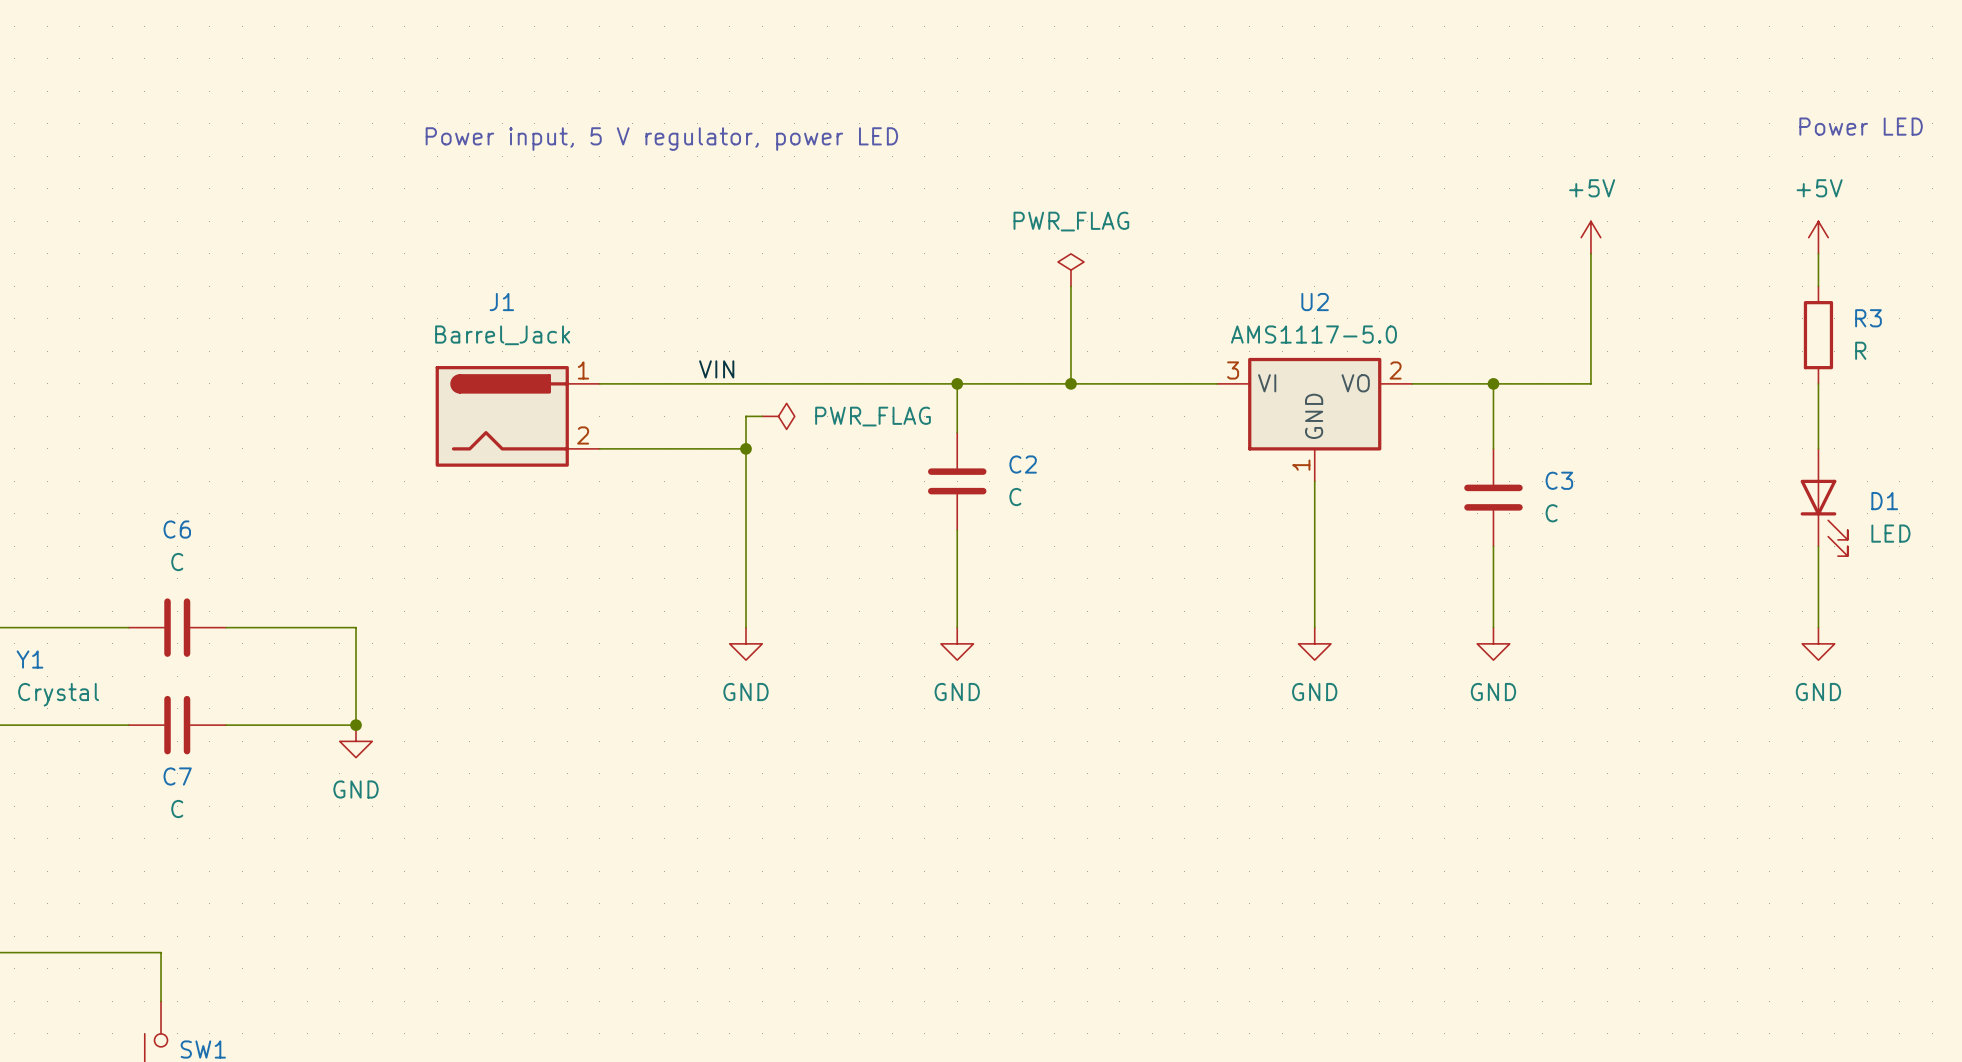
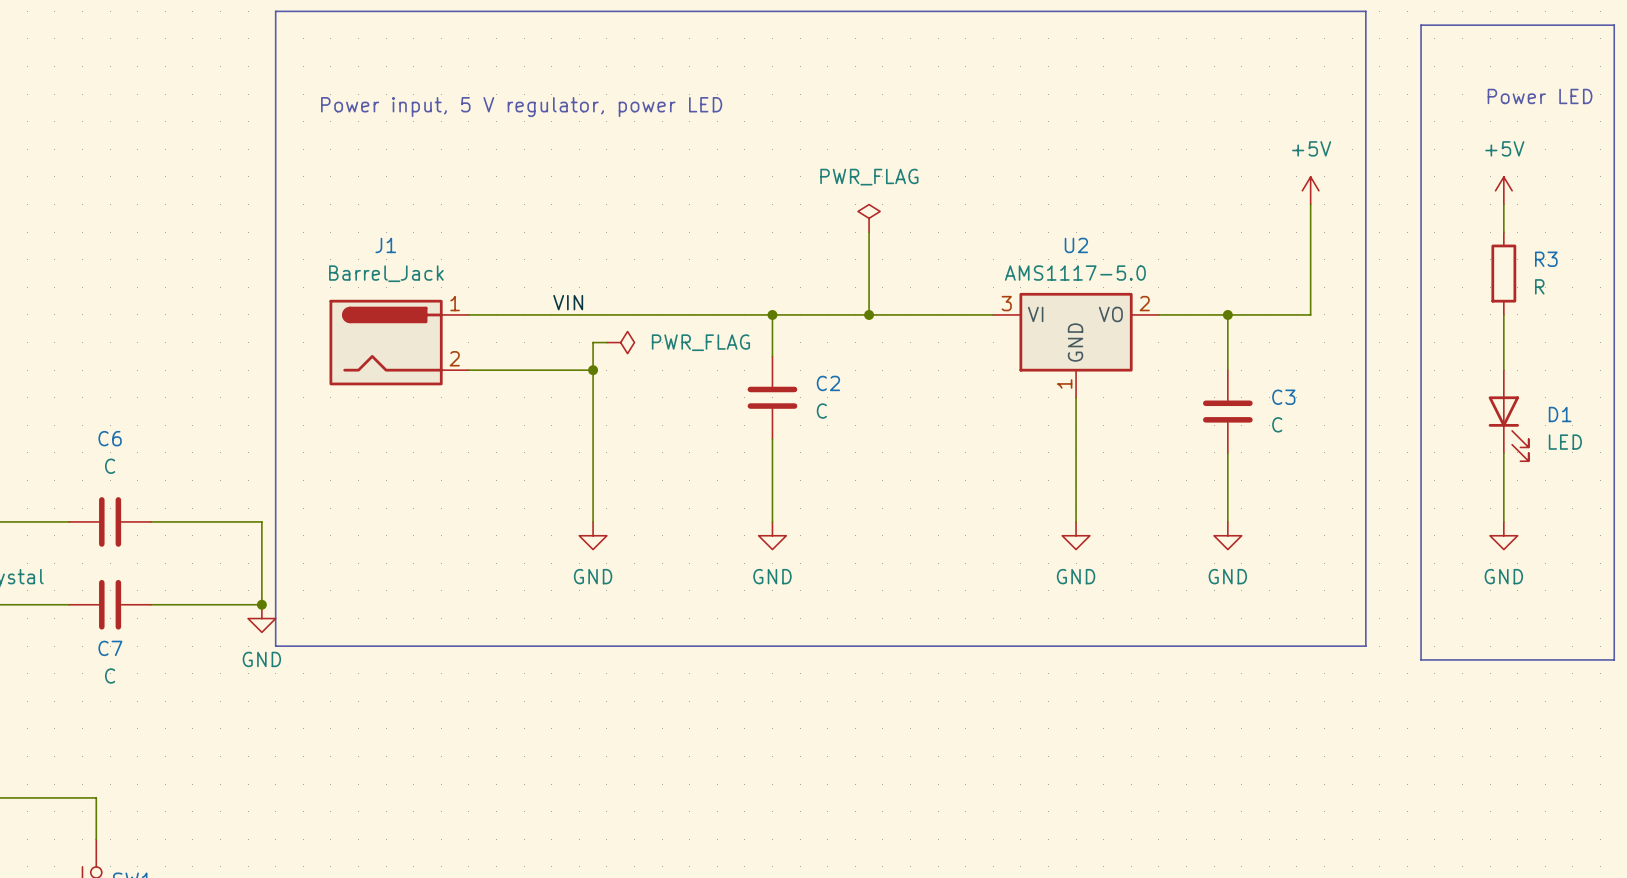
line: none -> (275, 11) (1365, 11) (1365, 646) (275, 646) (275, 11)
line: none -> (1421, 25) (1614, 25) (1614, 659) (1421, 659) (1421, 25)

